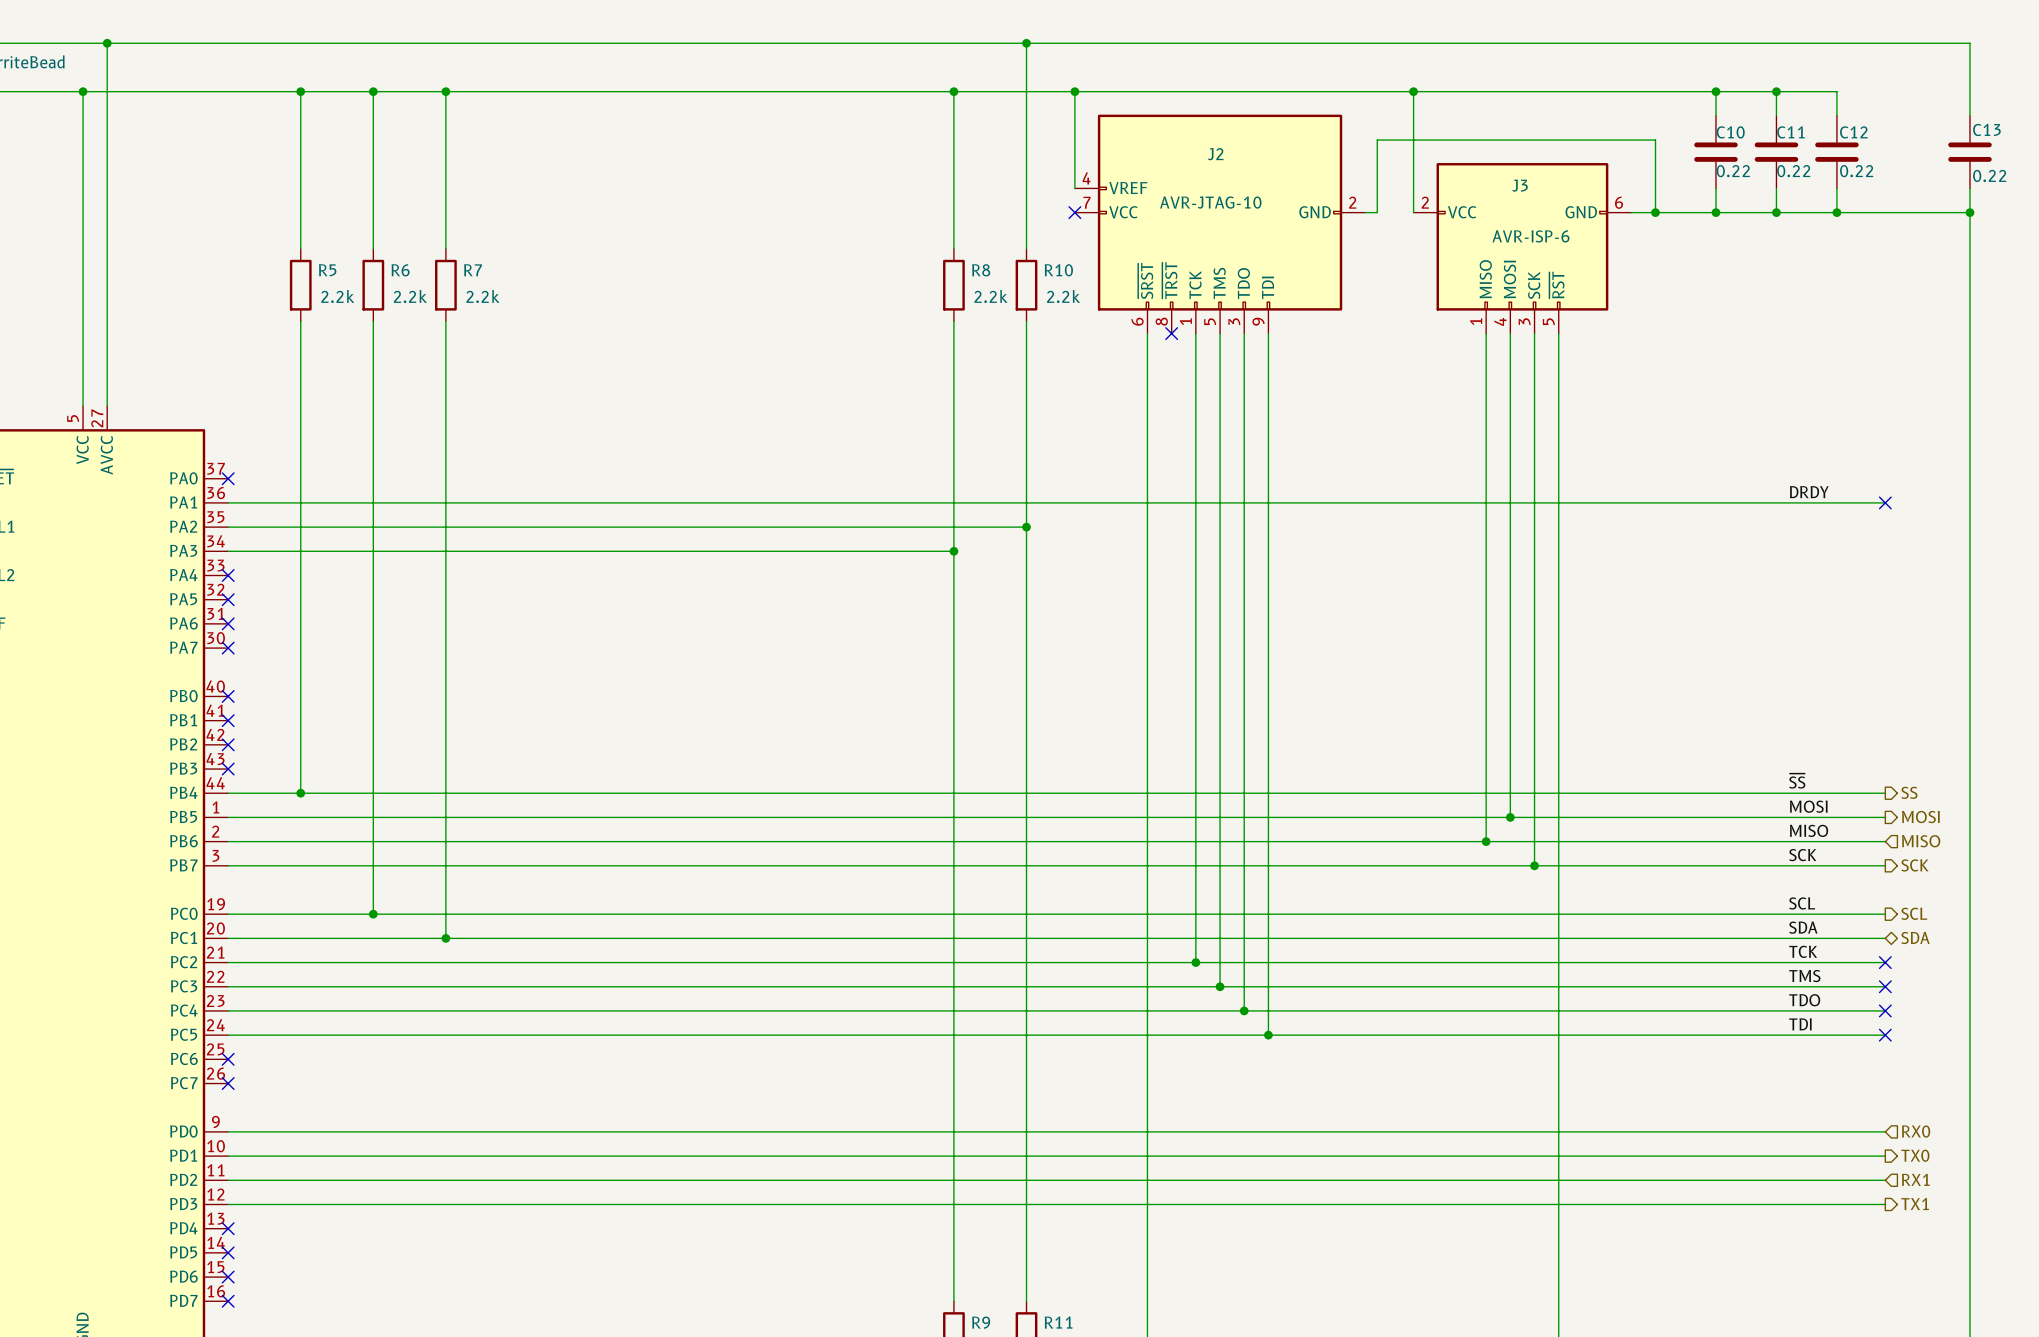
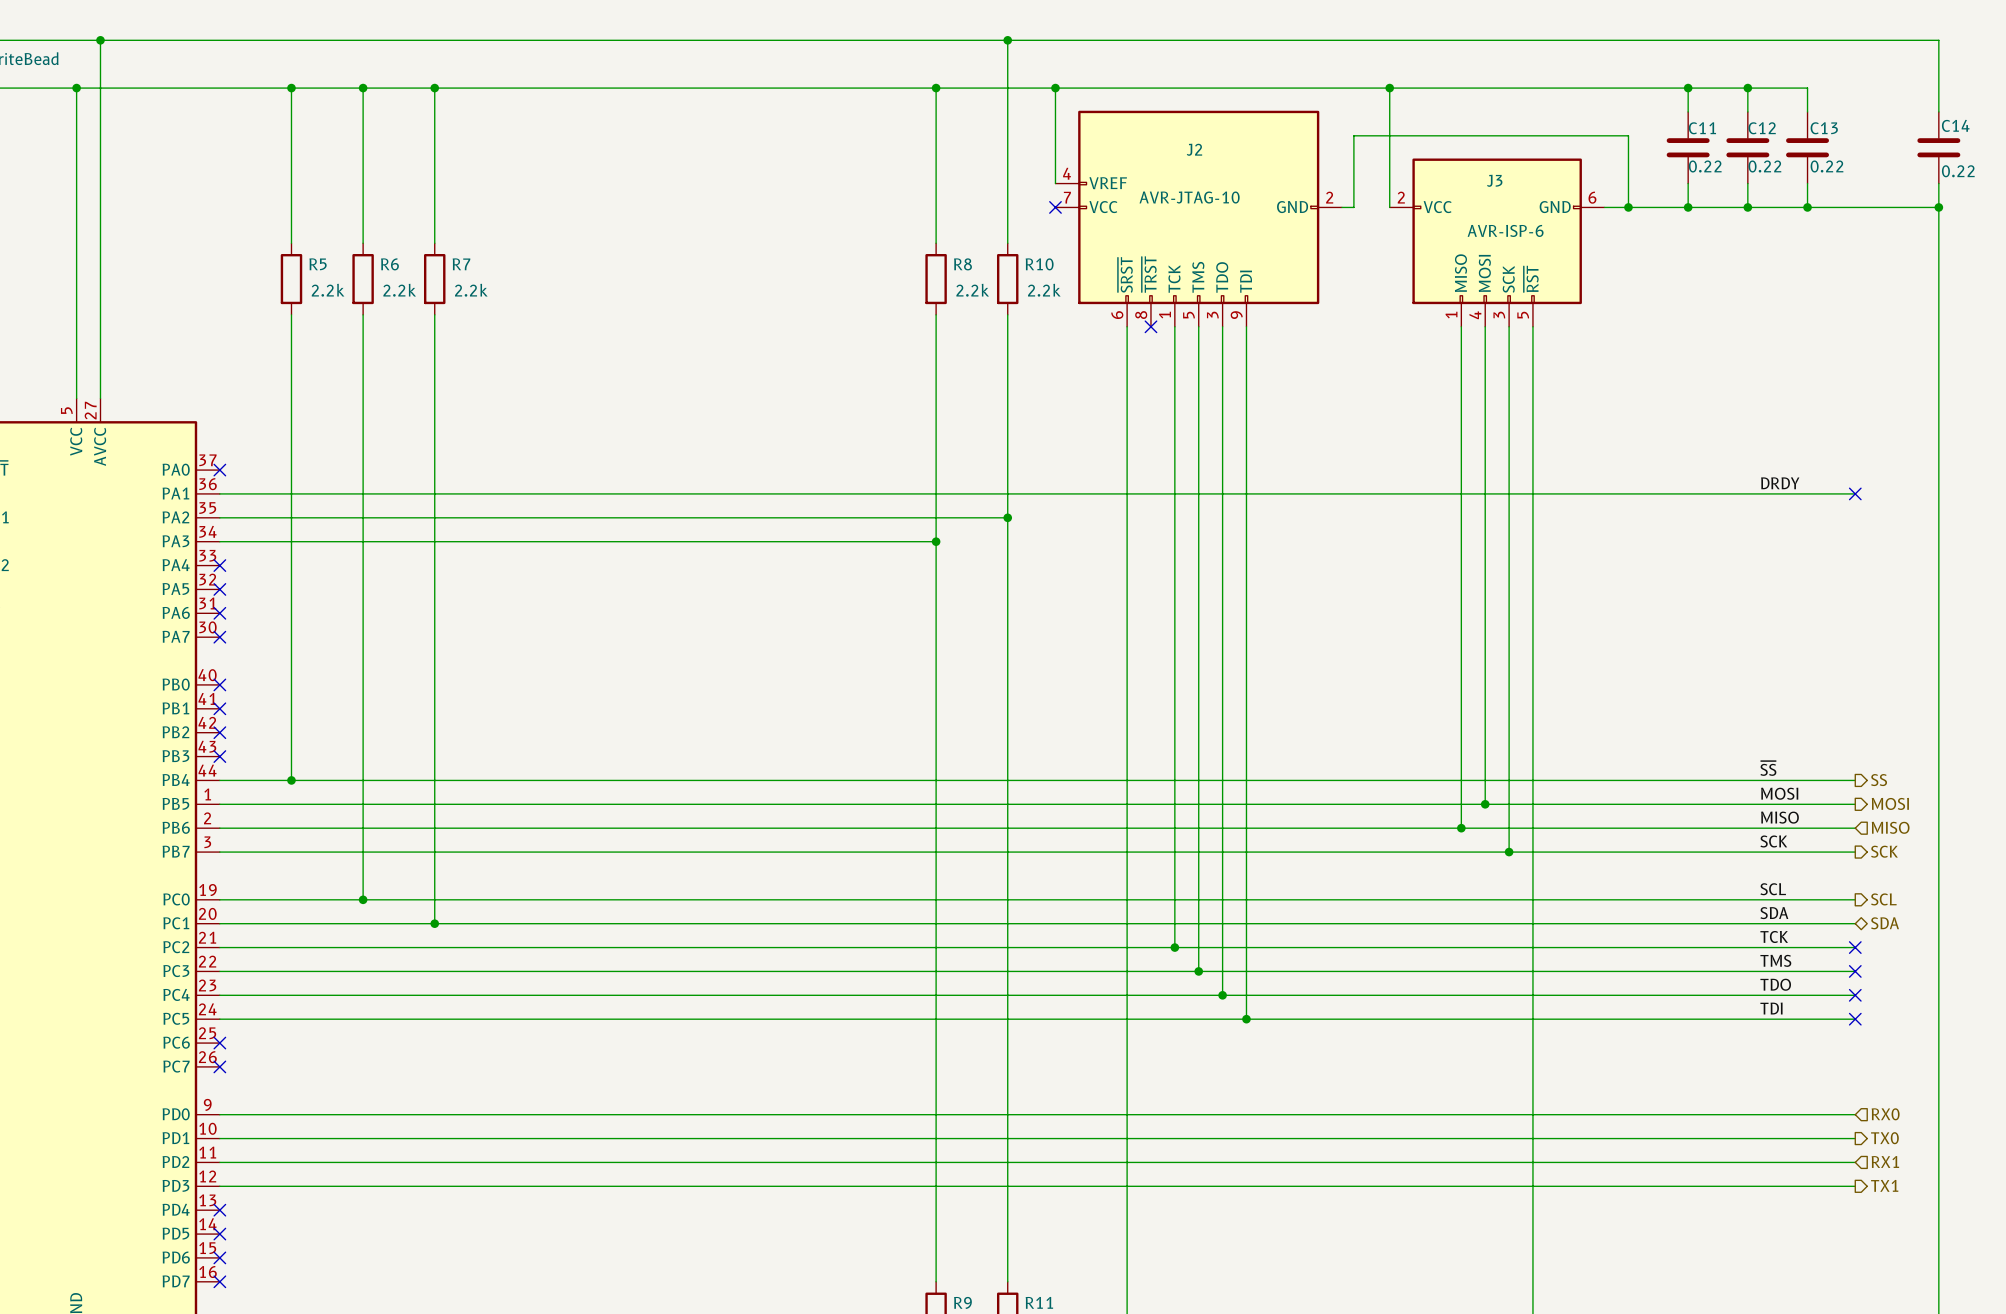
C13 name: C13 (1986, 129) -> C14 (1955, 125)
C10 name: C10 (1730, 132) -> C11 (1702, 128)
C11 name: C11 (1790, 132) -> C12 (1762, 128)
C12 name: C12 (1853, 132) -> C13 (1824, 128)

